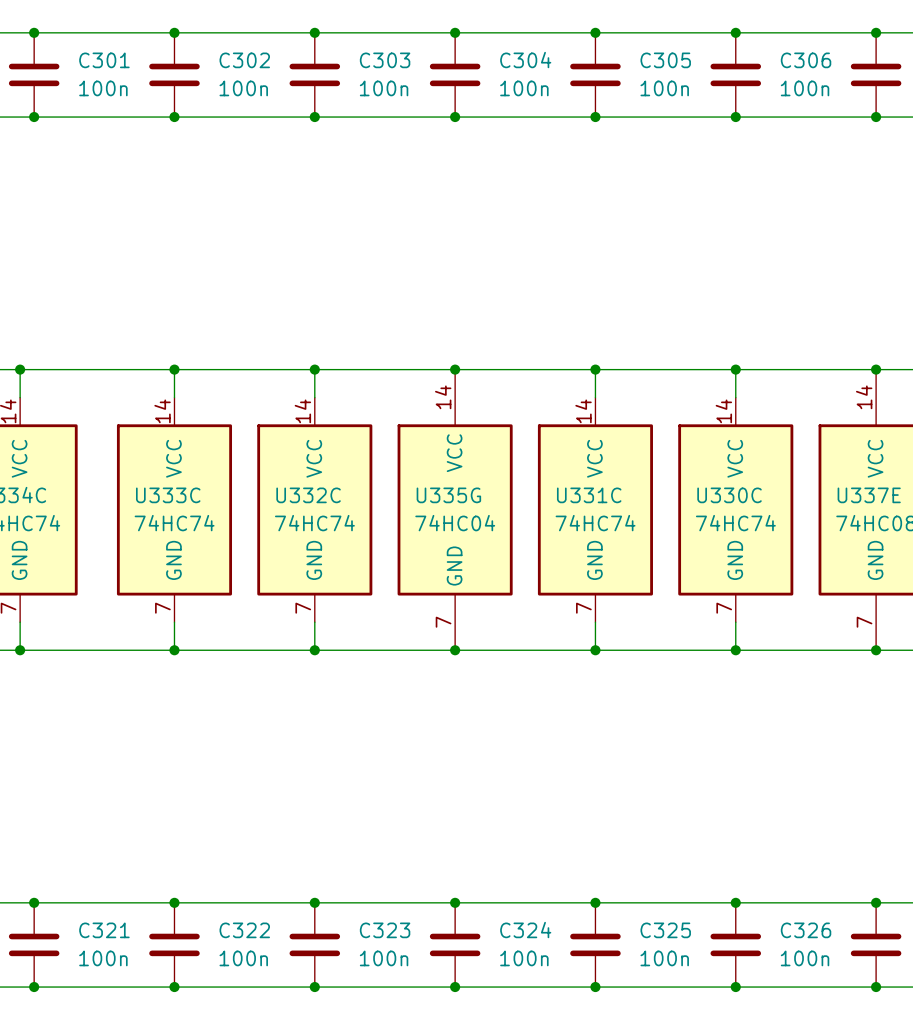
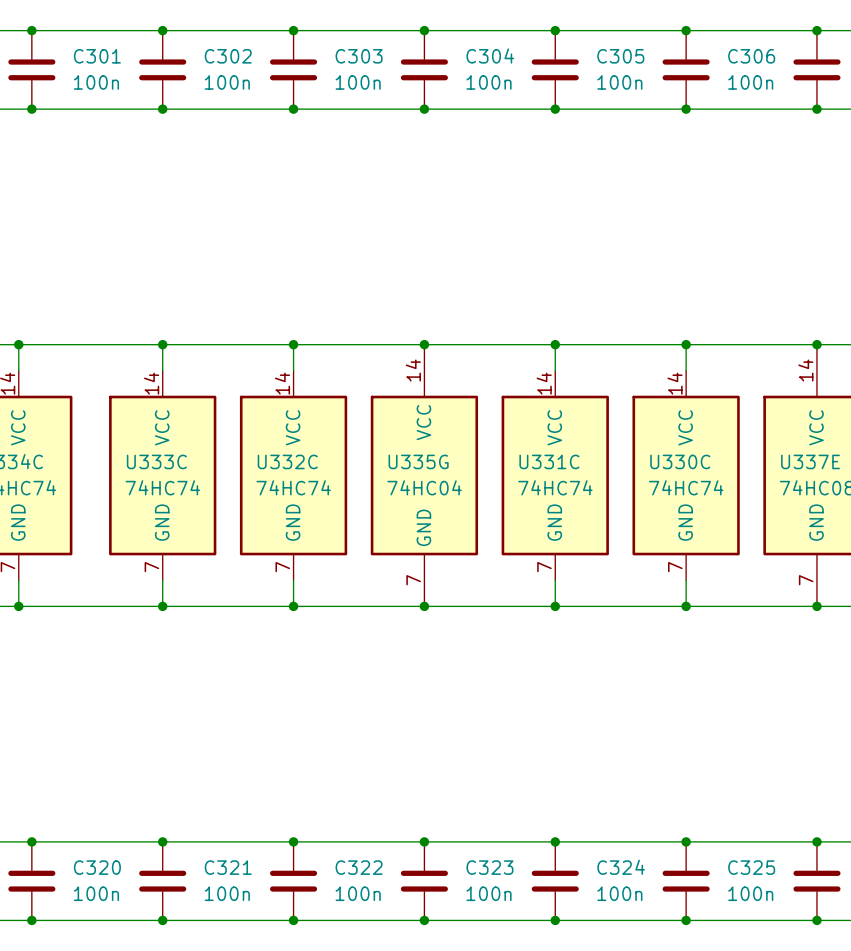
C321 name: C321 (104, 930) -> C320 (97, 867)
C322 name: C322 (244, 930) -> C321 (228, 867)
C323 name: C323 (385, 930) -> C322 (359, 867)
C324 name: C324 (525, 930) -> C323 (489, 867)
C325 name: C325 (665, 930) -> C324 (621, 867)
C326 name: C326 (806, 930) -> C325 (751, 867)

